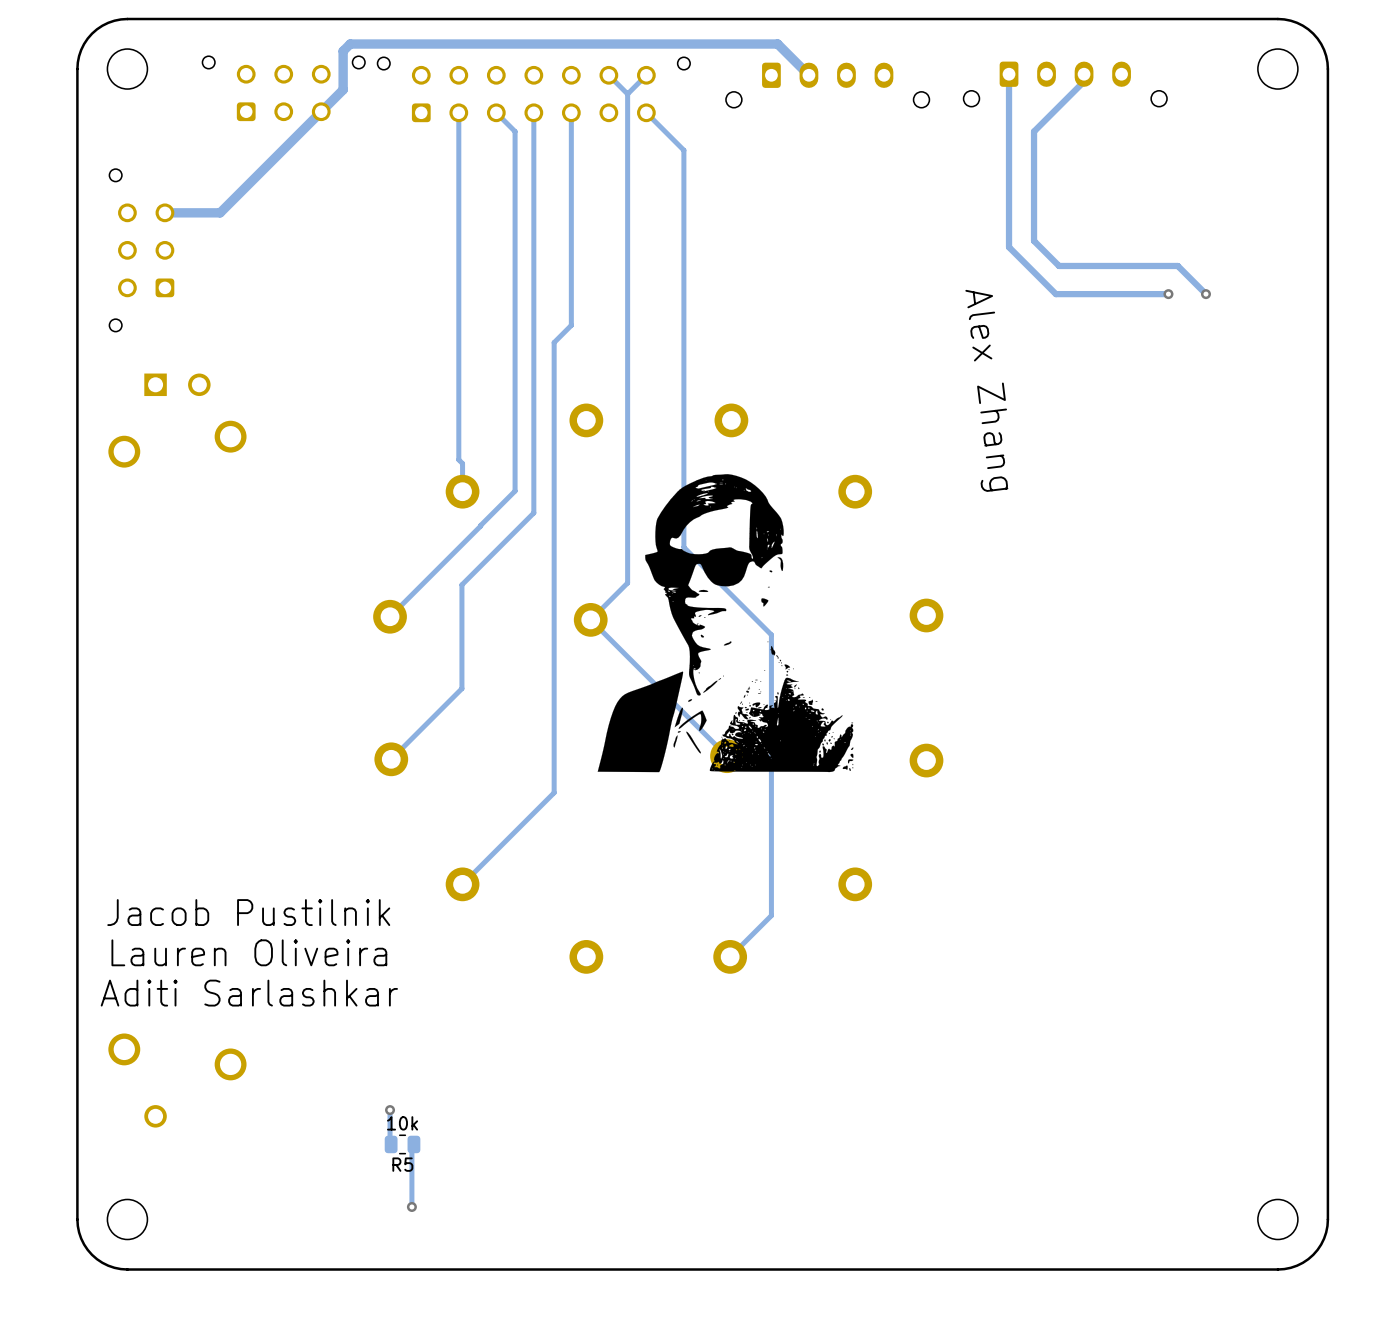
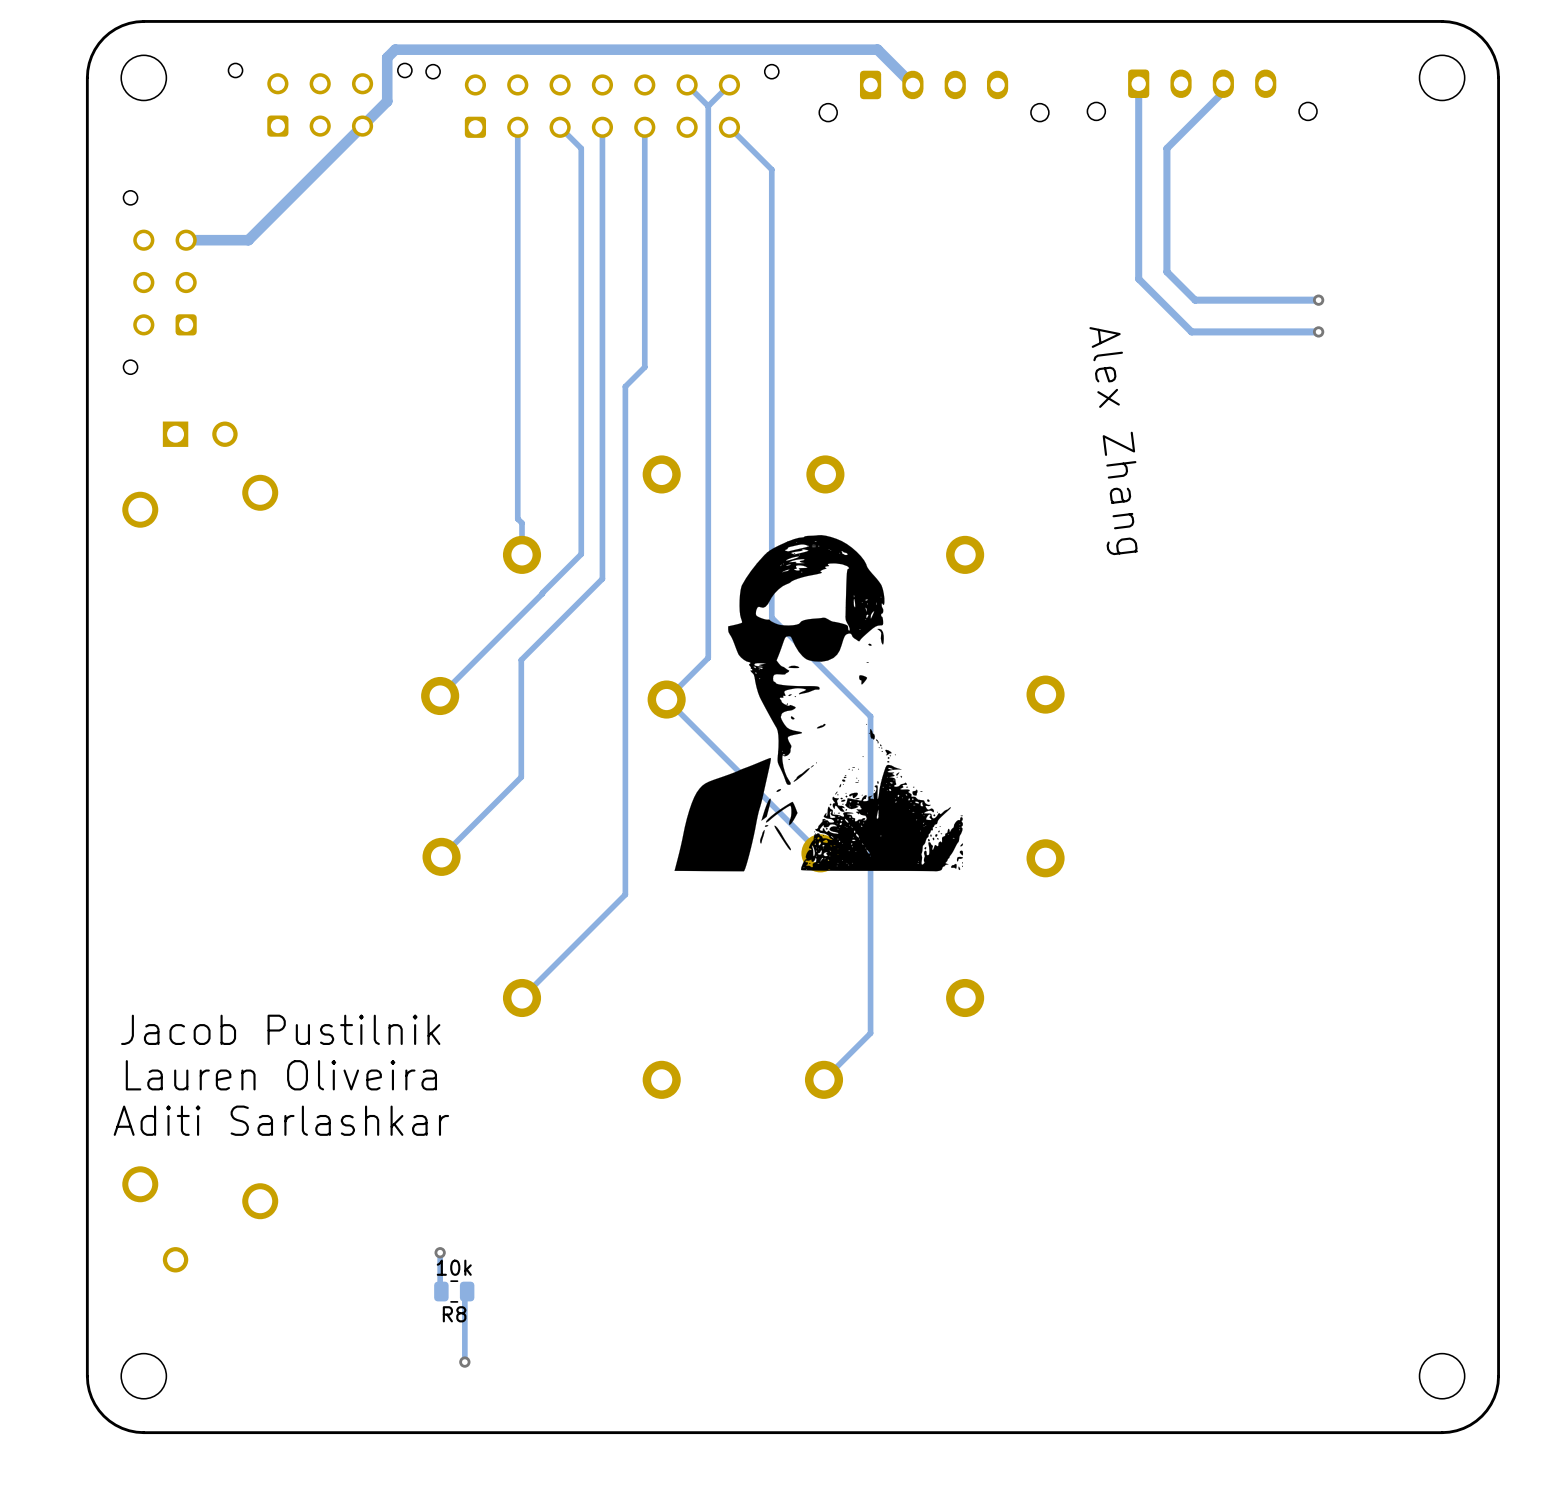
track: (1168, 265) (1177, 265) (1205, 294) -> none
via position: (1205, 294) -> (1318, 300)
R5 name: R5 (402, 1164) -> R8 (454, 1314)

